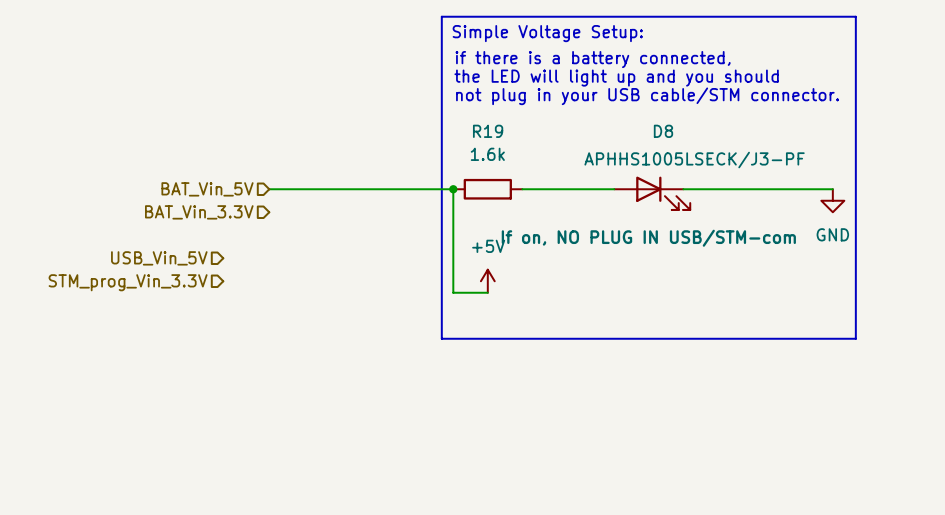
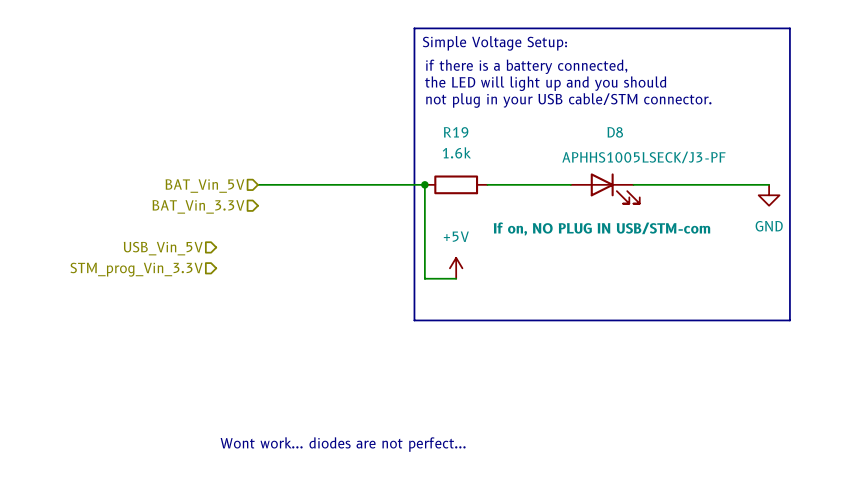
text: none -> Wont work... diodes are not perfect... (343, 444)

